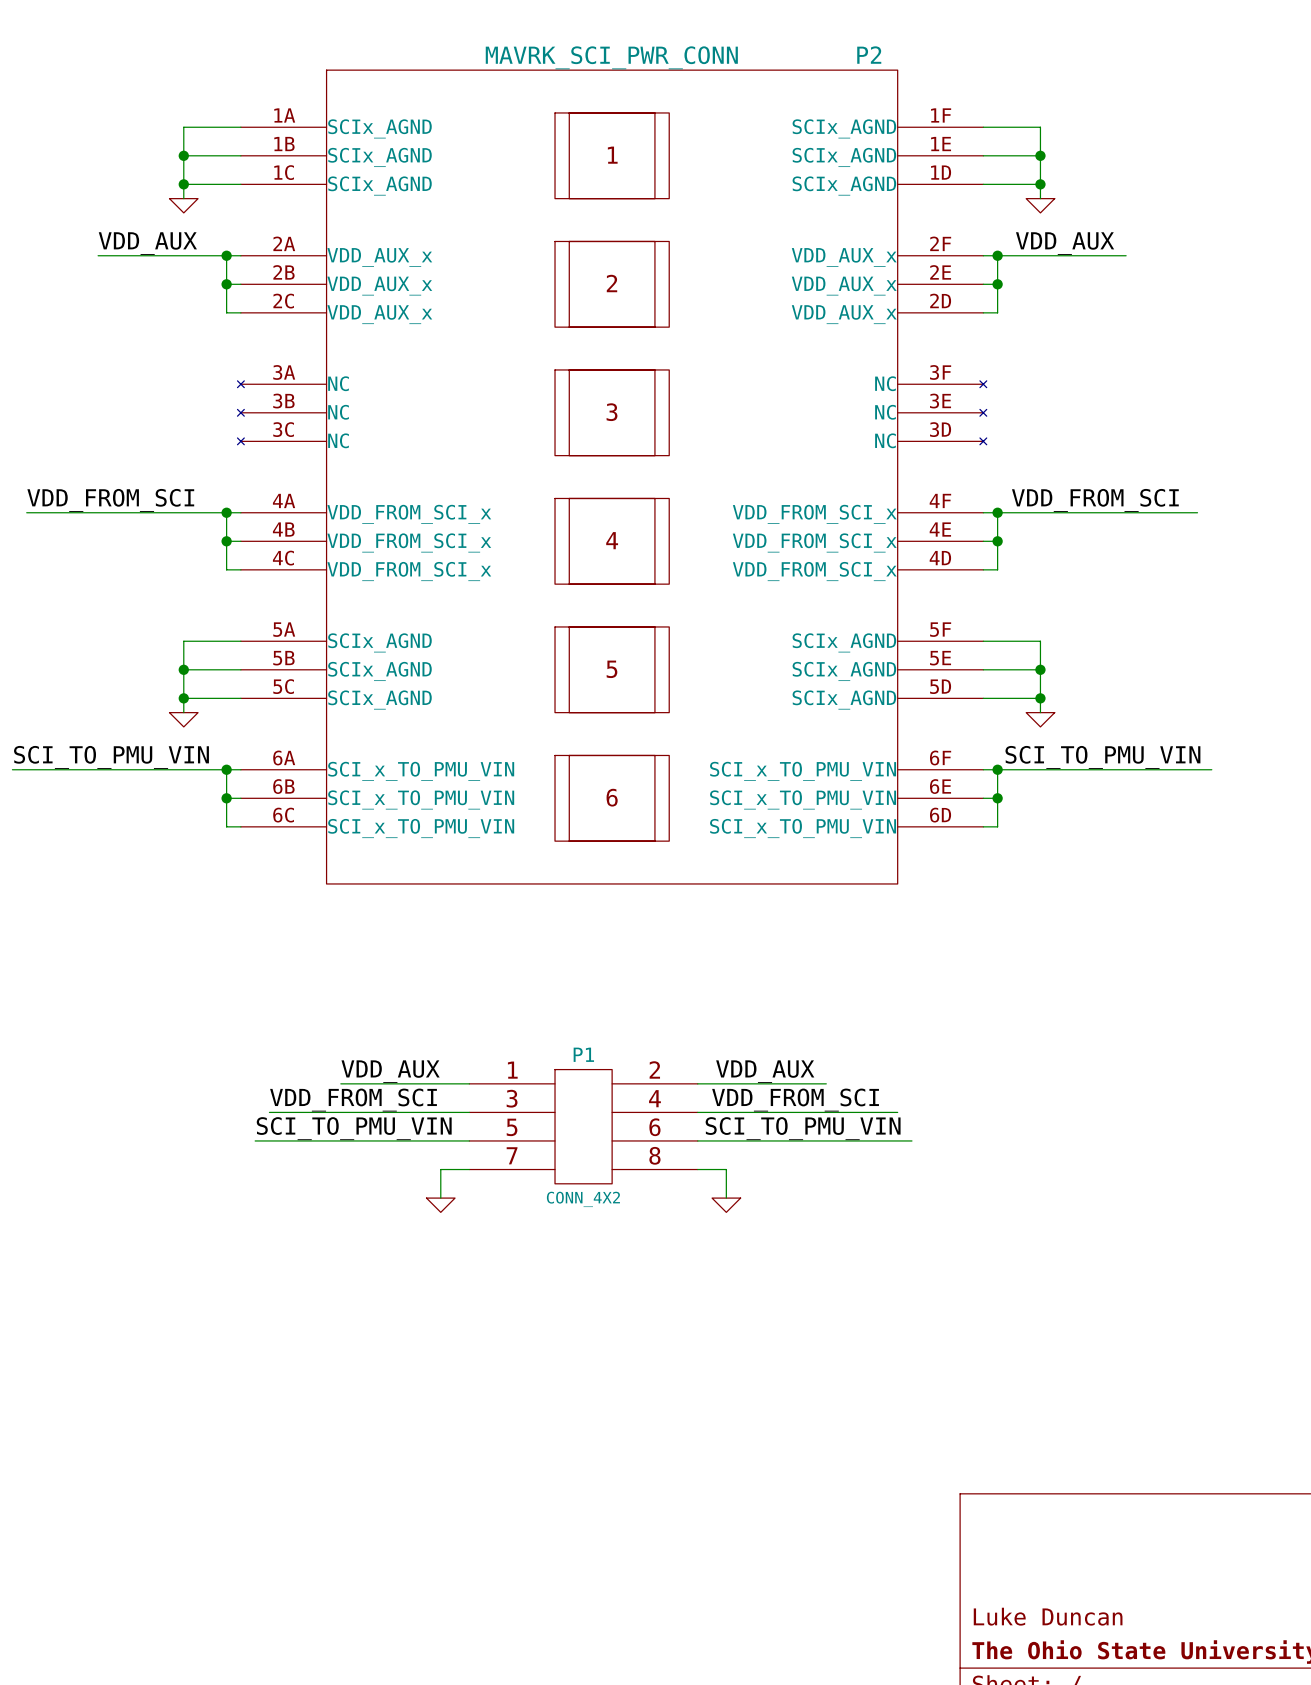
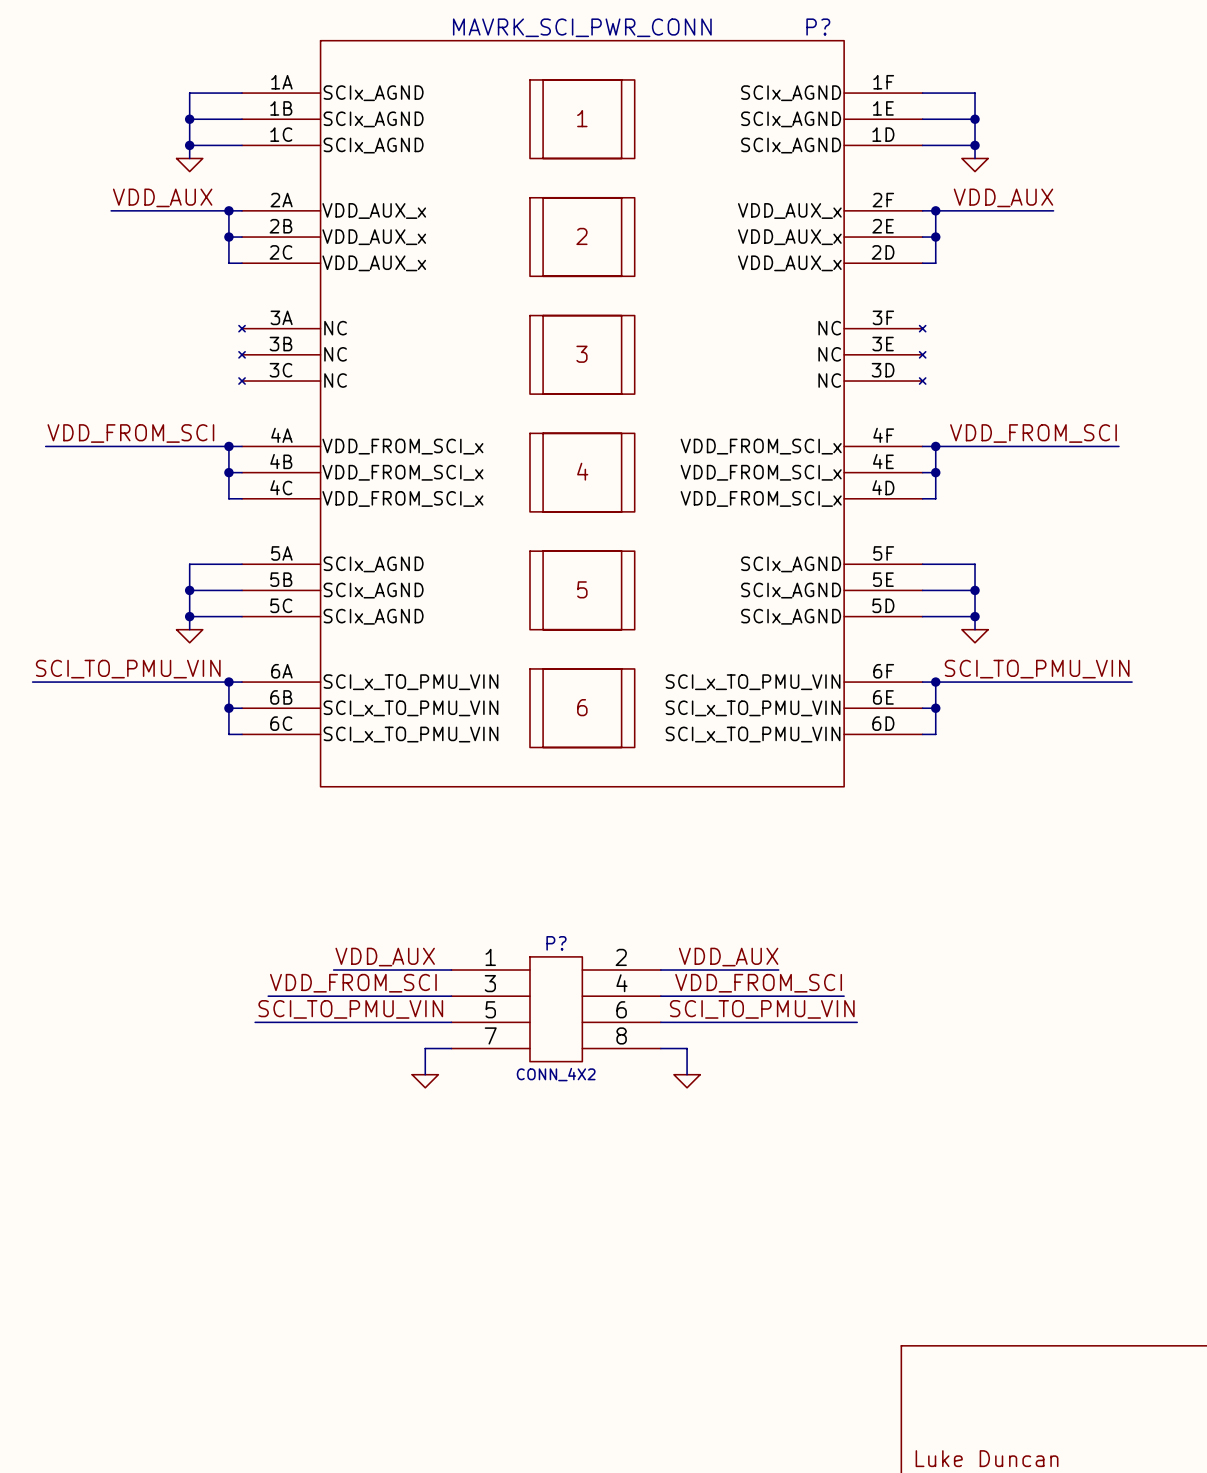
P2 name: P2 (869, 55) -> P? (818, 27)
P1 name: P1 (583, 1054) -> P? (556, 943)

